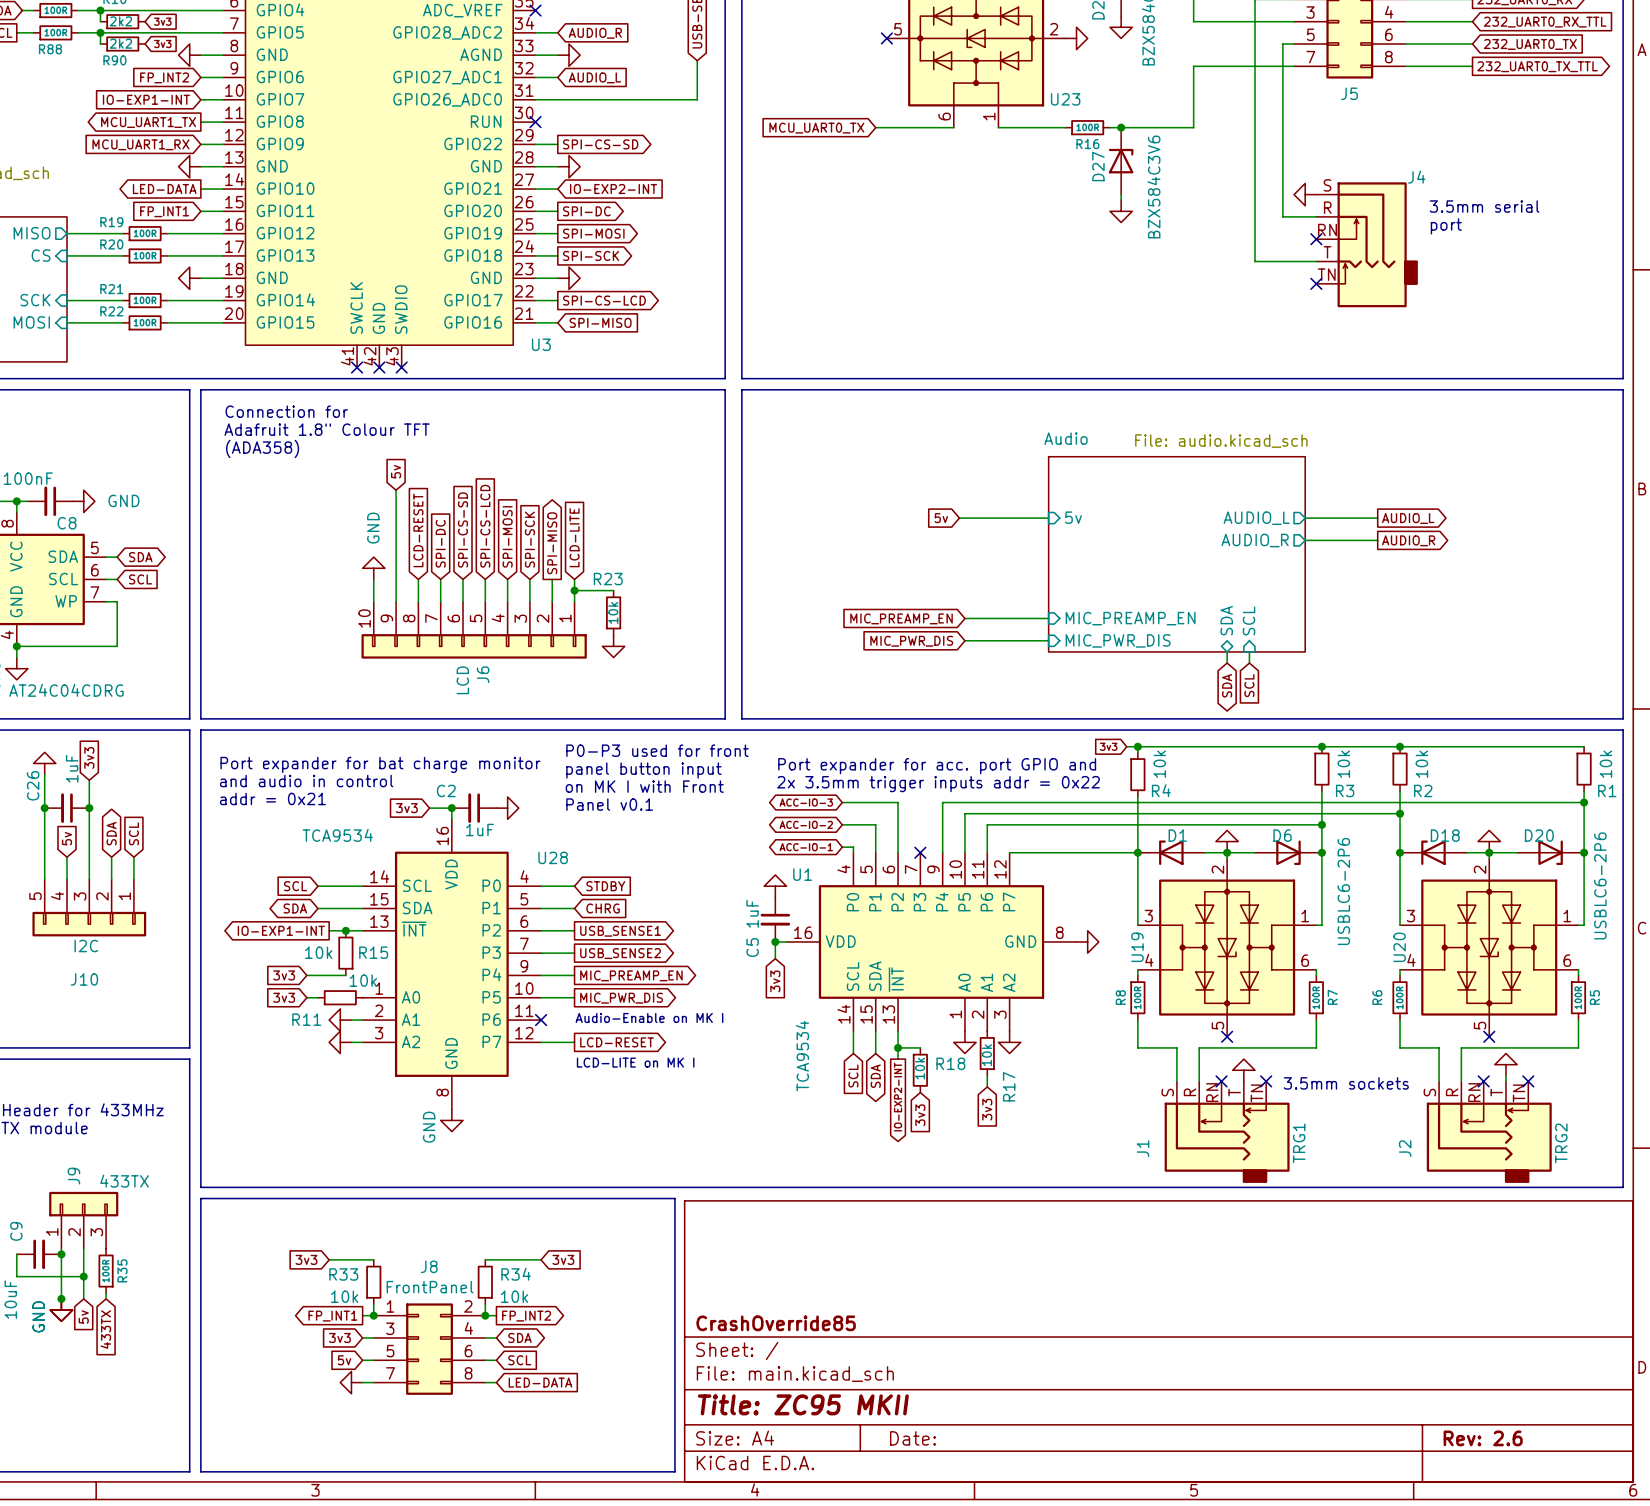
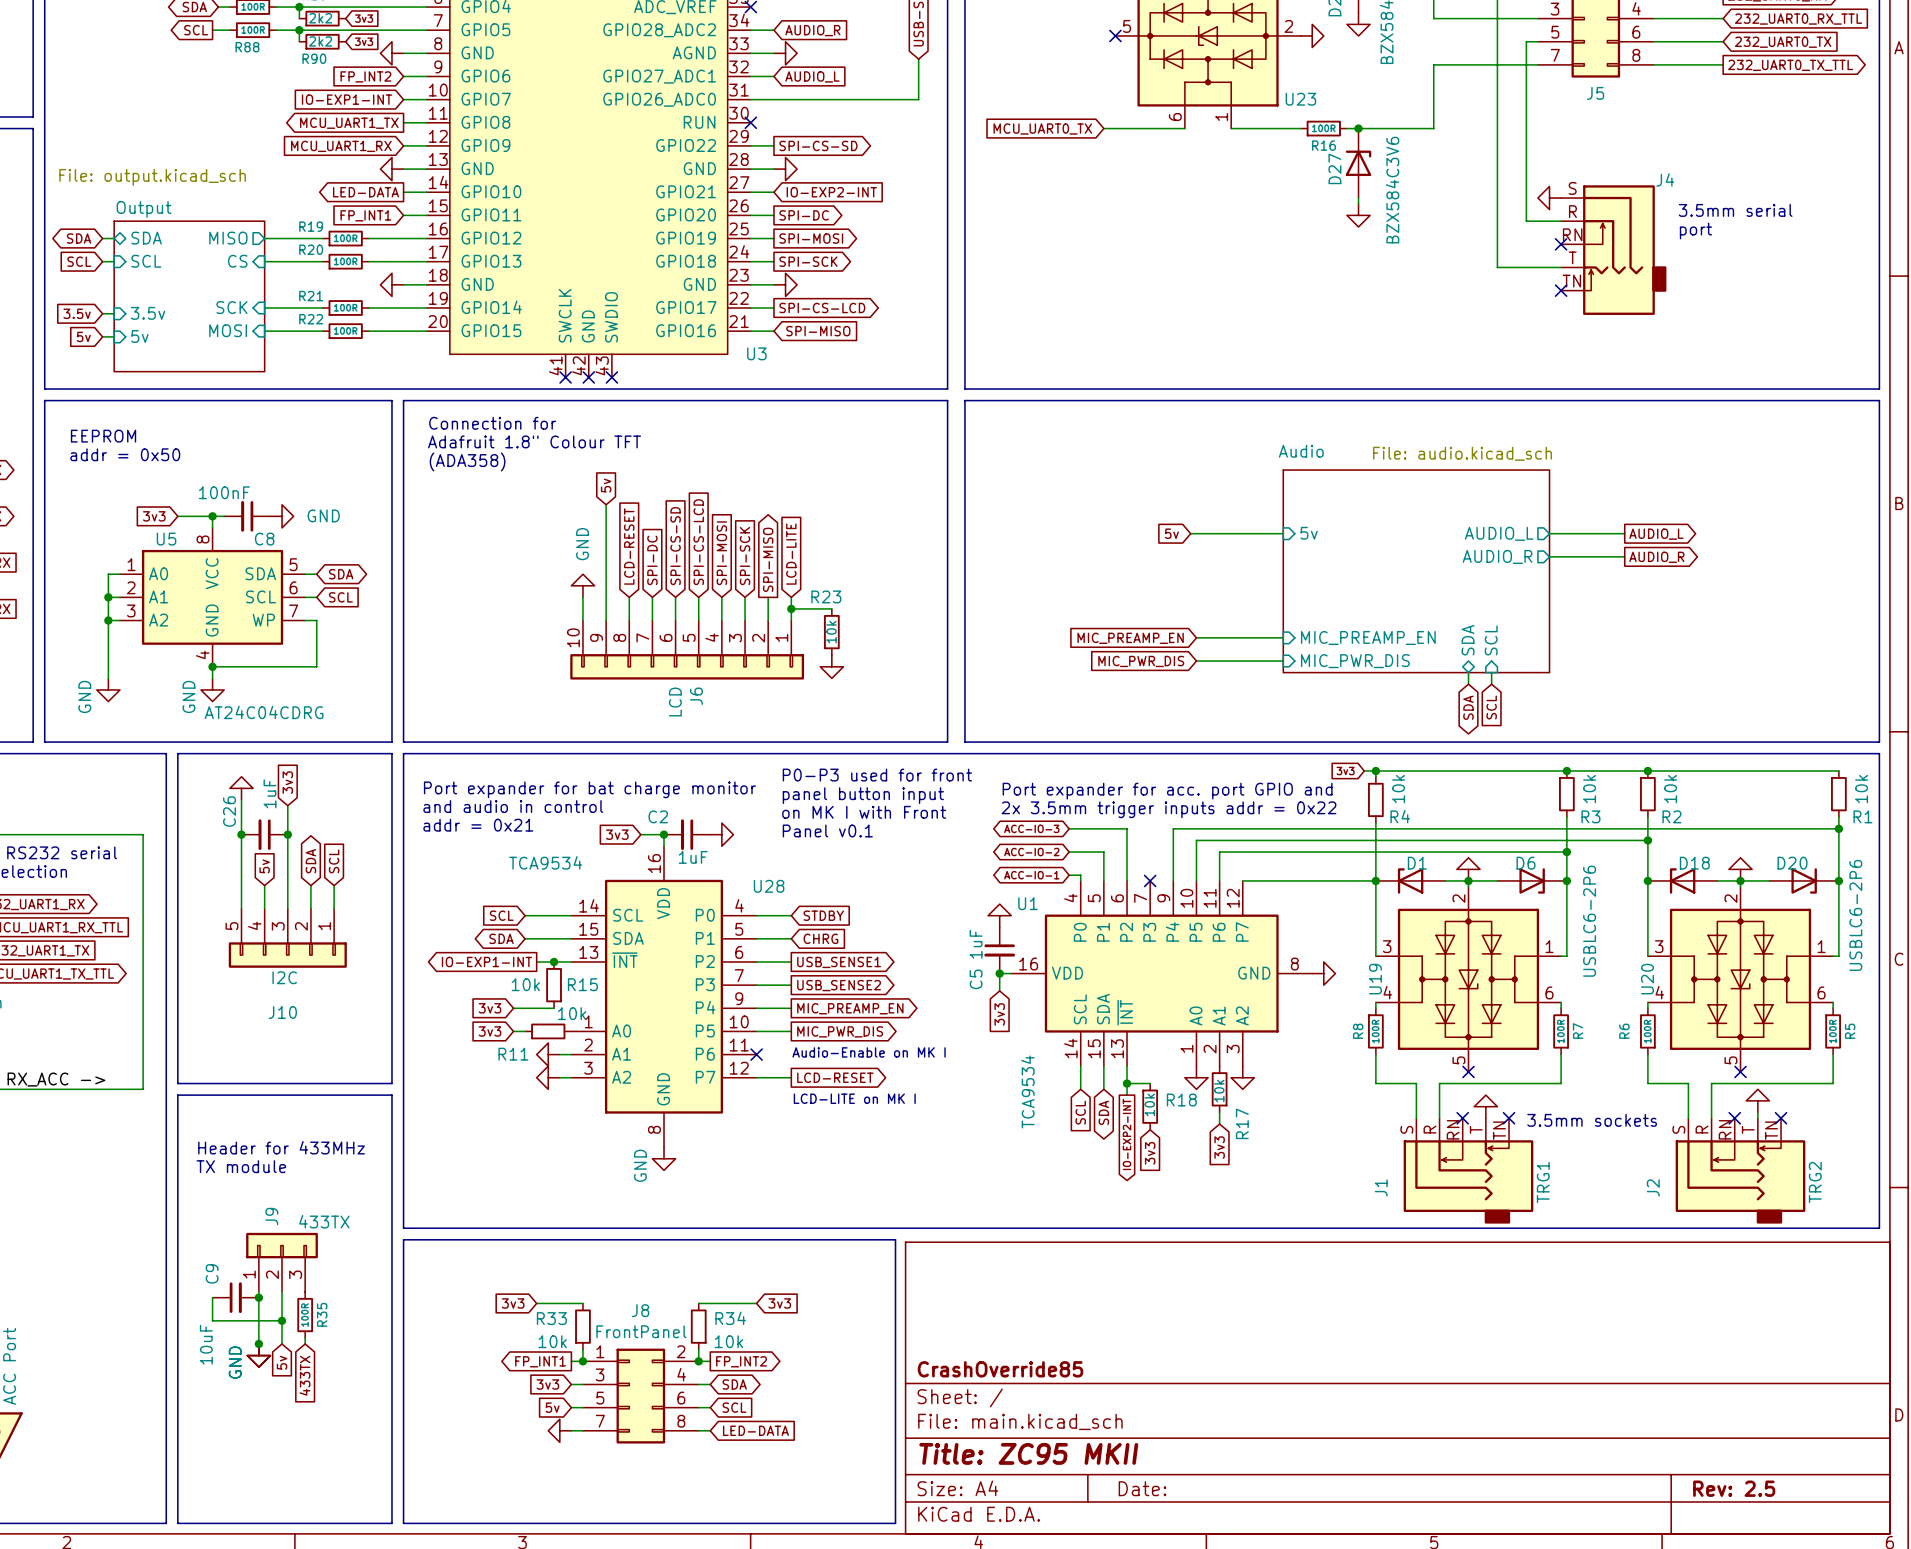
title block: Rev: 2.6 (1483, 1438) -> Rev: 2.5 (1734, 1488)

